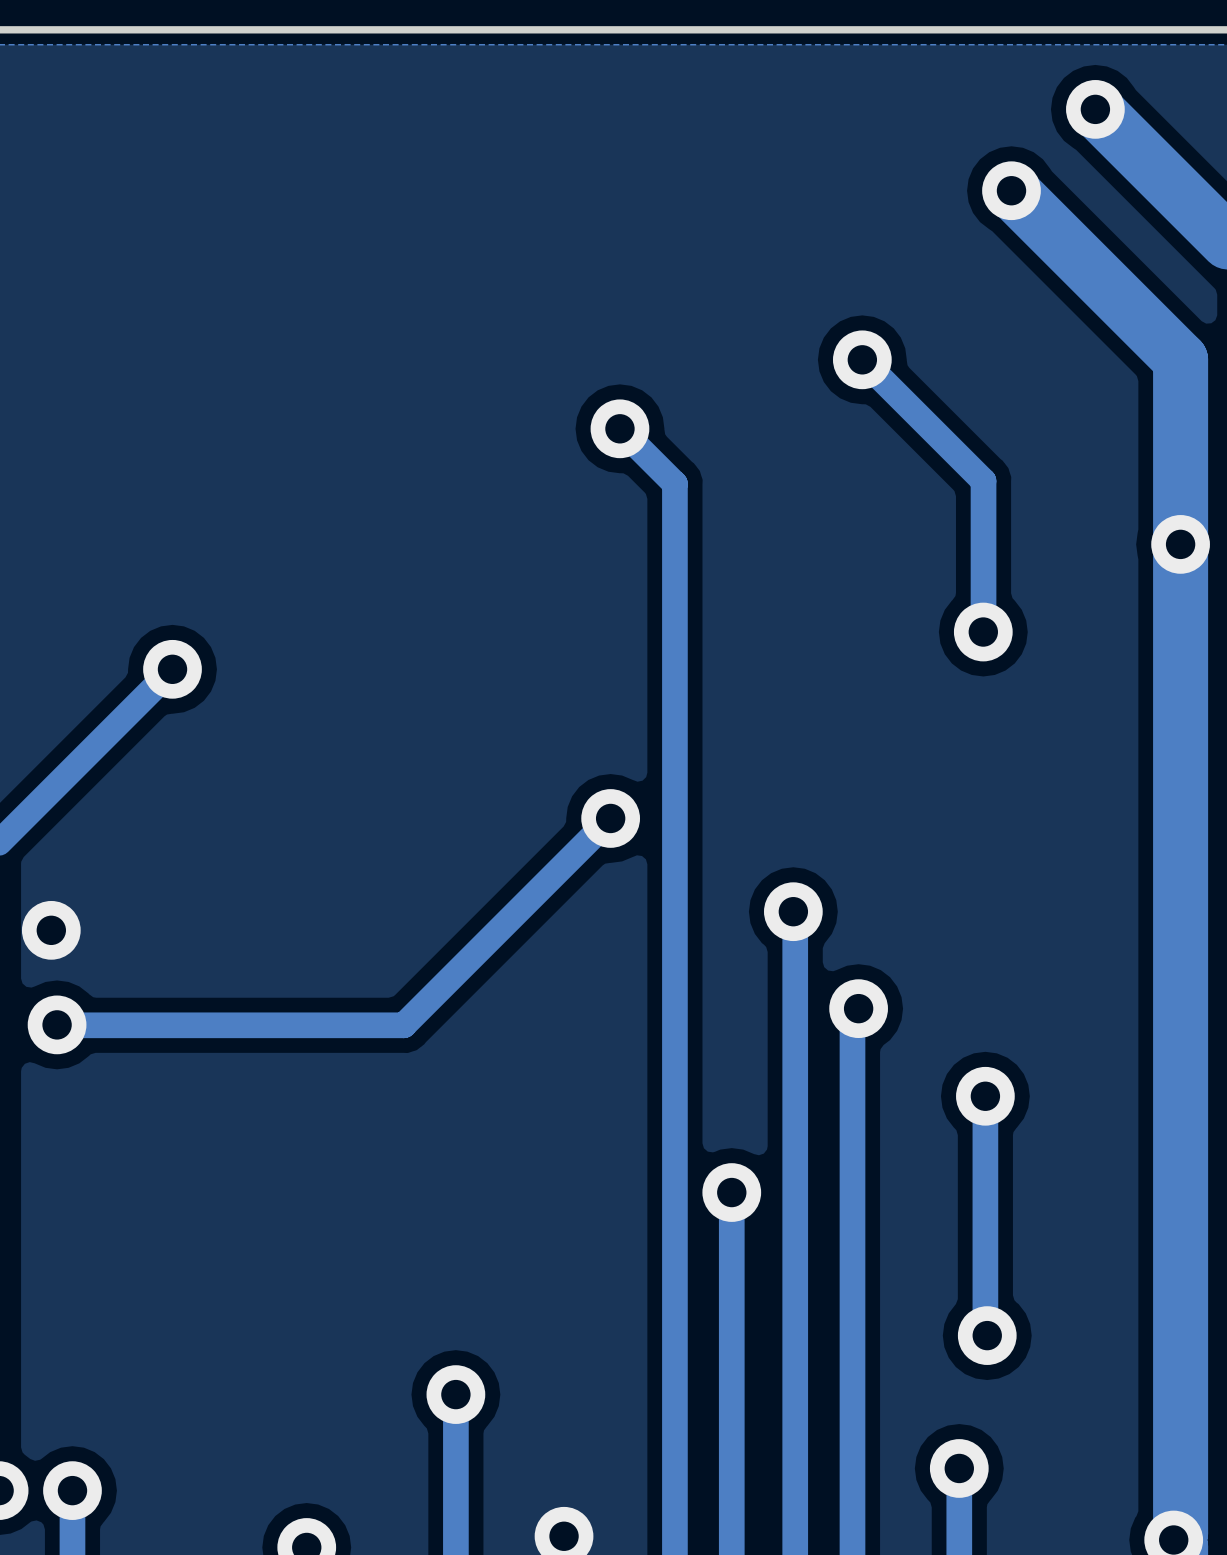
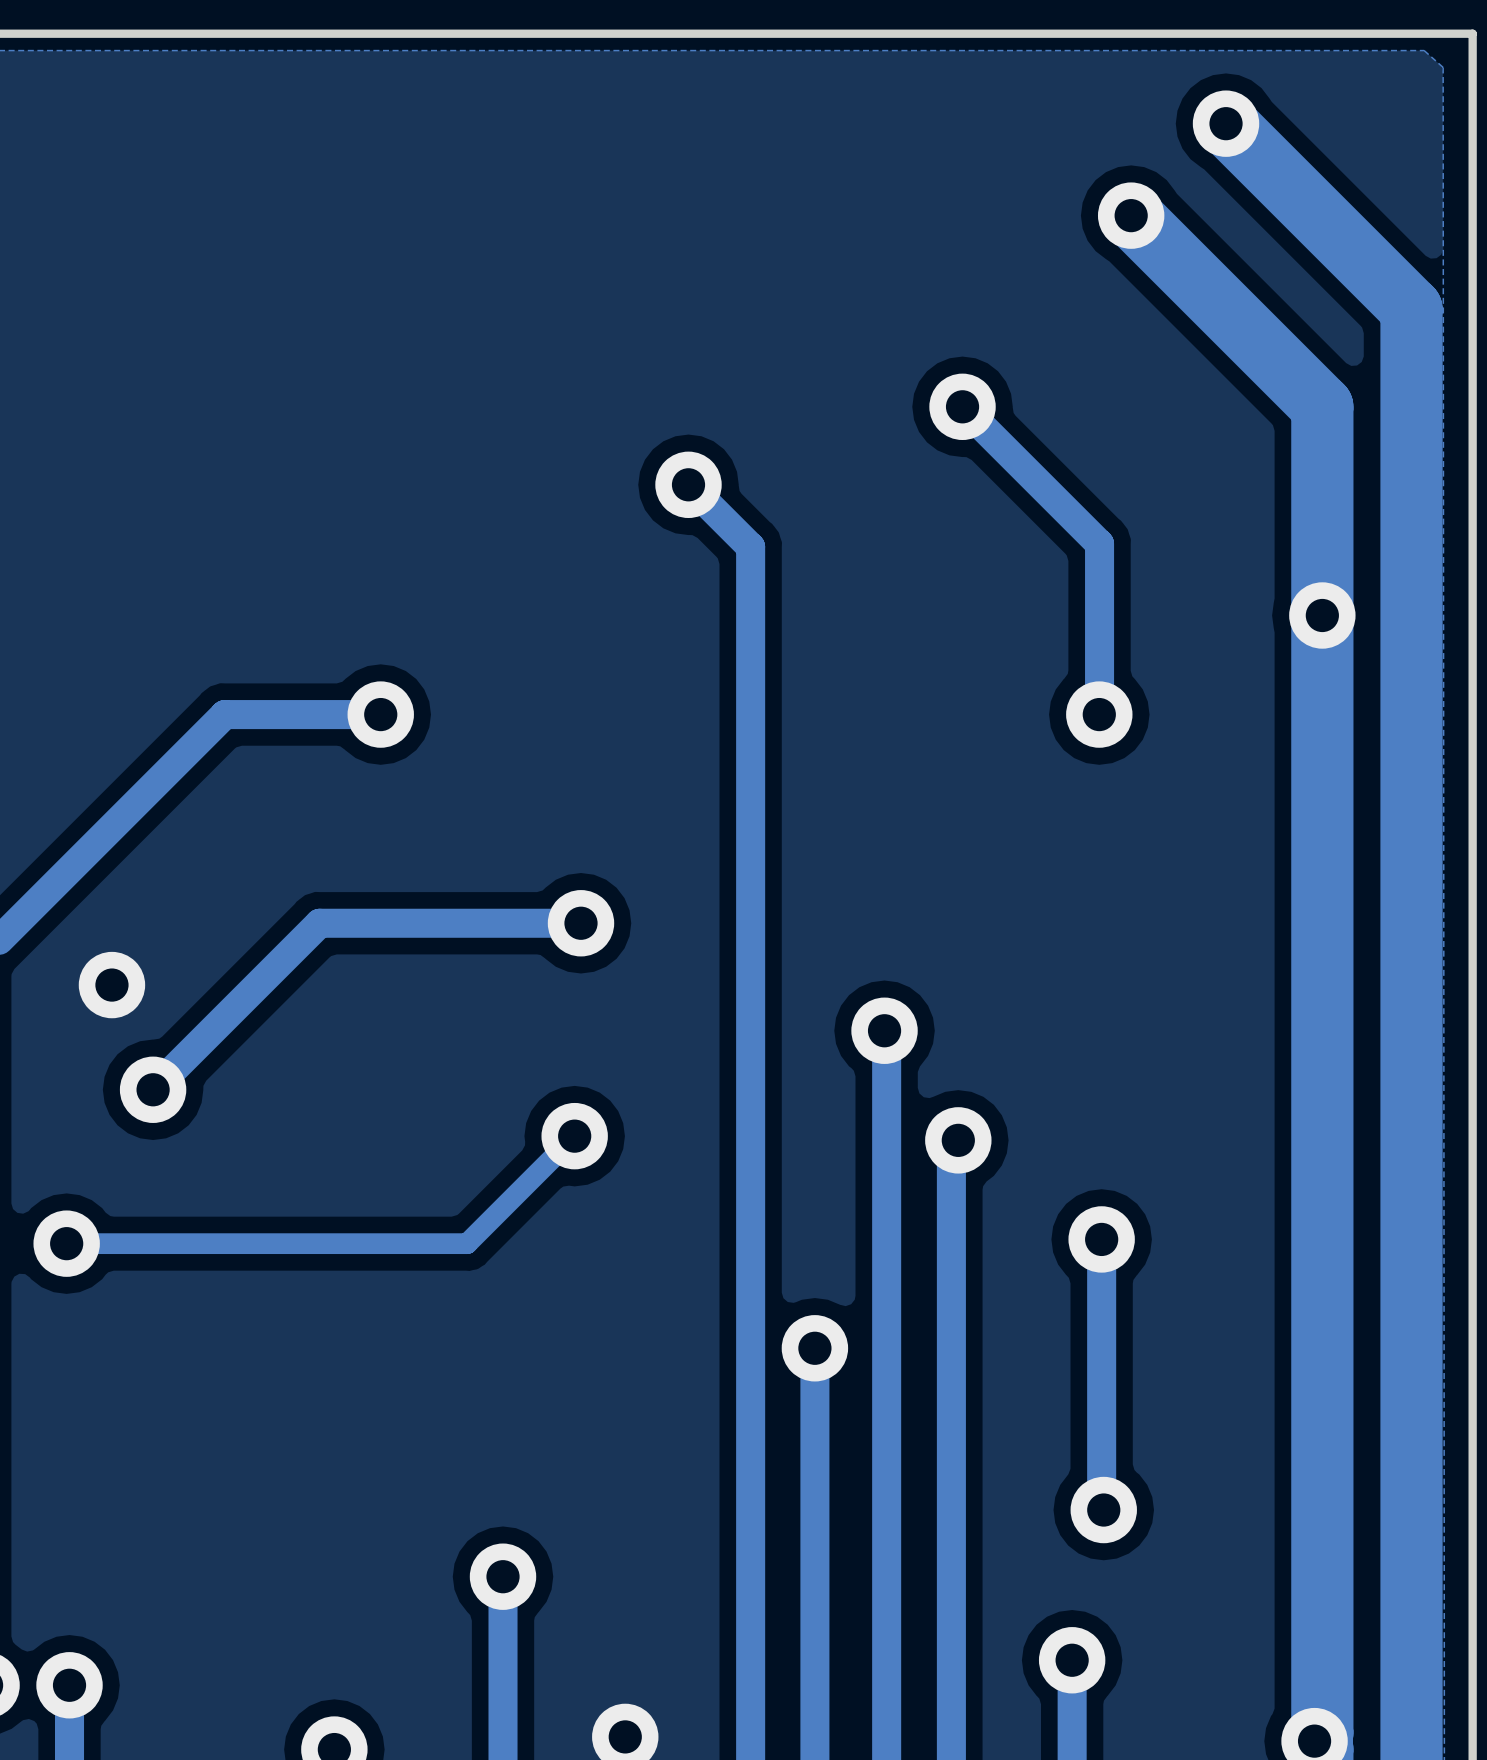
track: none -> (380, 714) (224, 714) (182, 756)
via: none -> (380, 714)
via: (172, 669) -> none
track: none -> (581, 923) (319, 923) (153, 1089)
track: (610, 818) (403, 1025) (57, 1025) -> none
via position: (610, 818) -> (581, 923)
via: none -> (111, 985)
via: (51, 930) -> none
via: none -> (153, 1089)
track: none -> (574, 1136) (467, 1243) (66, 1243)
via: none -> (574, 1136)
via: (57, 1024) -> none
via: none -> (66, 1243)

